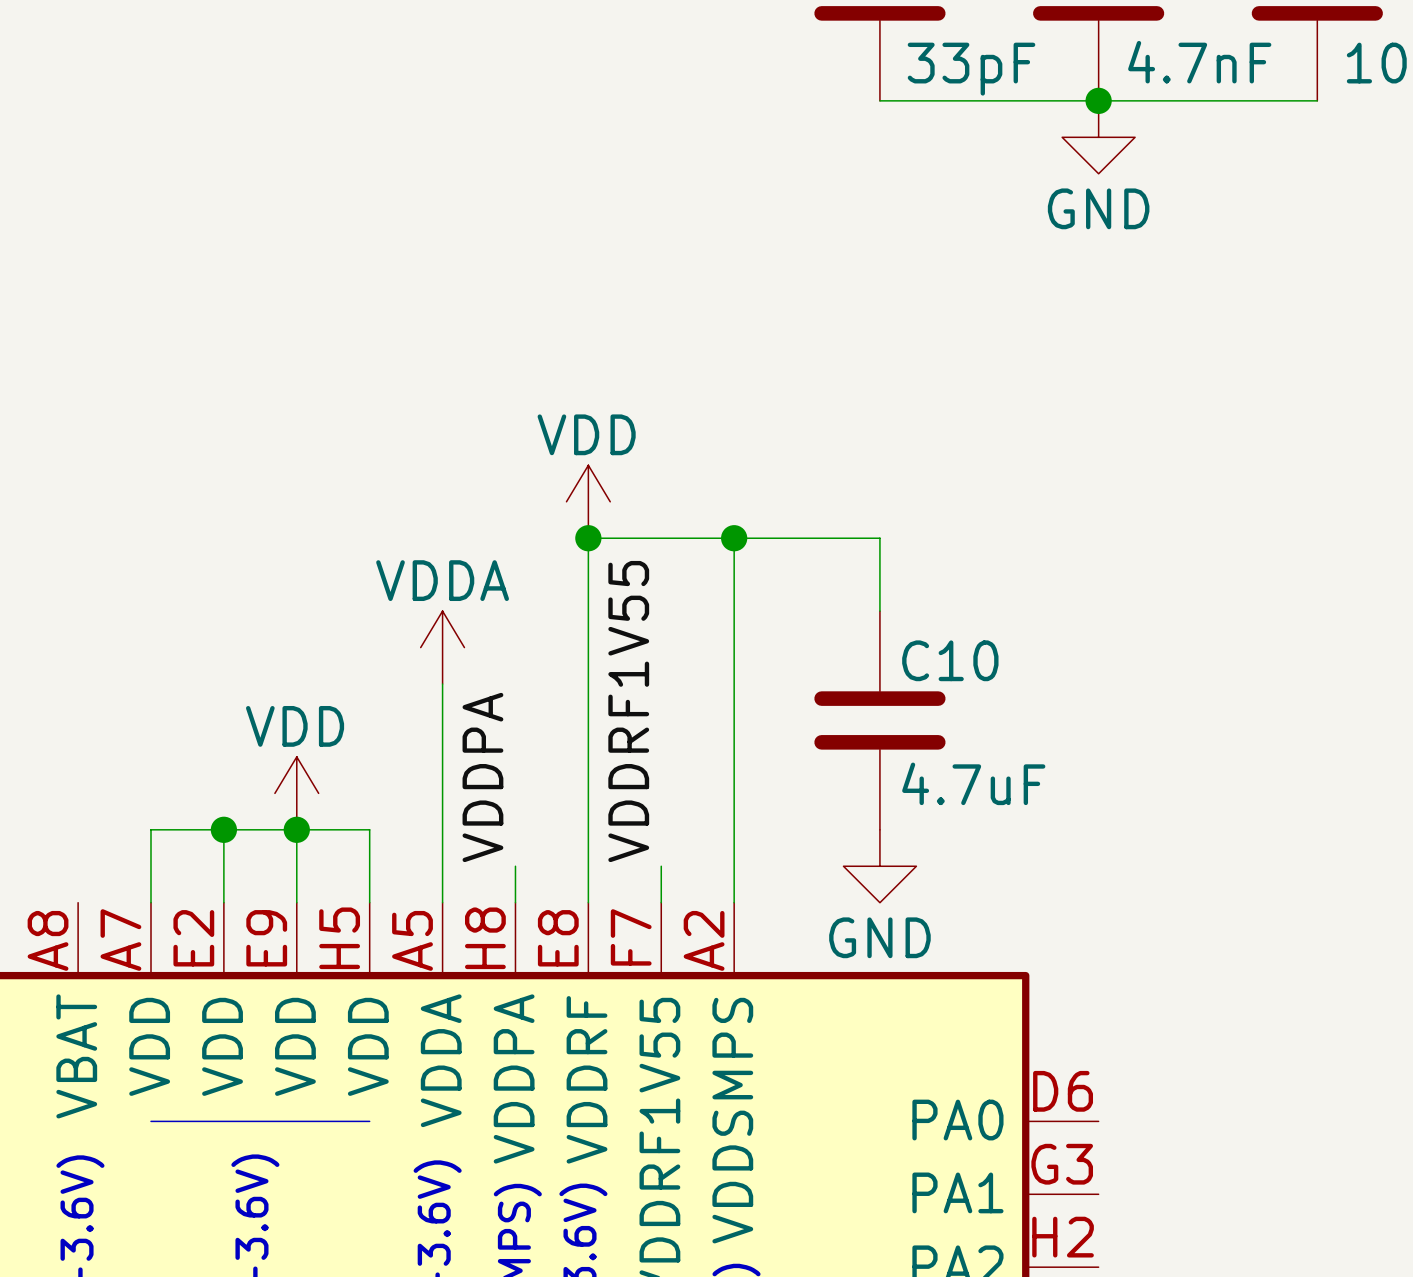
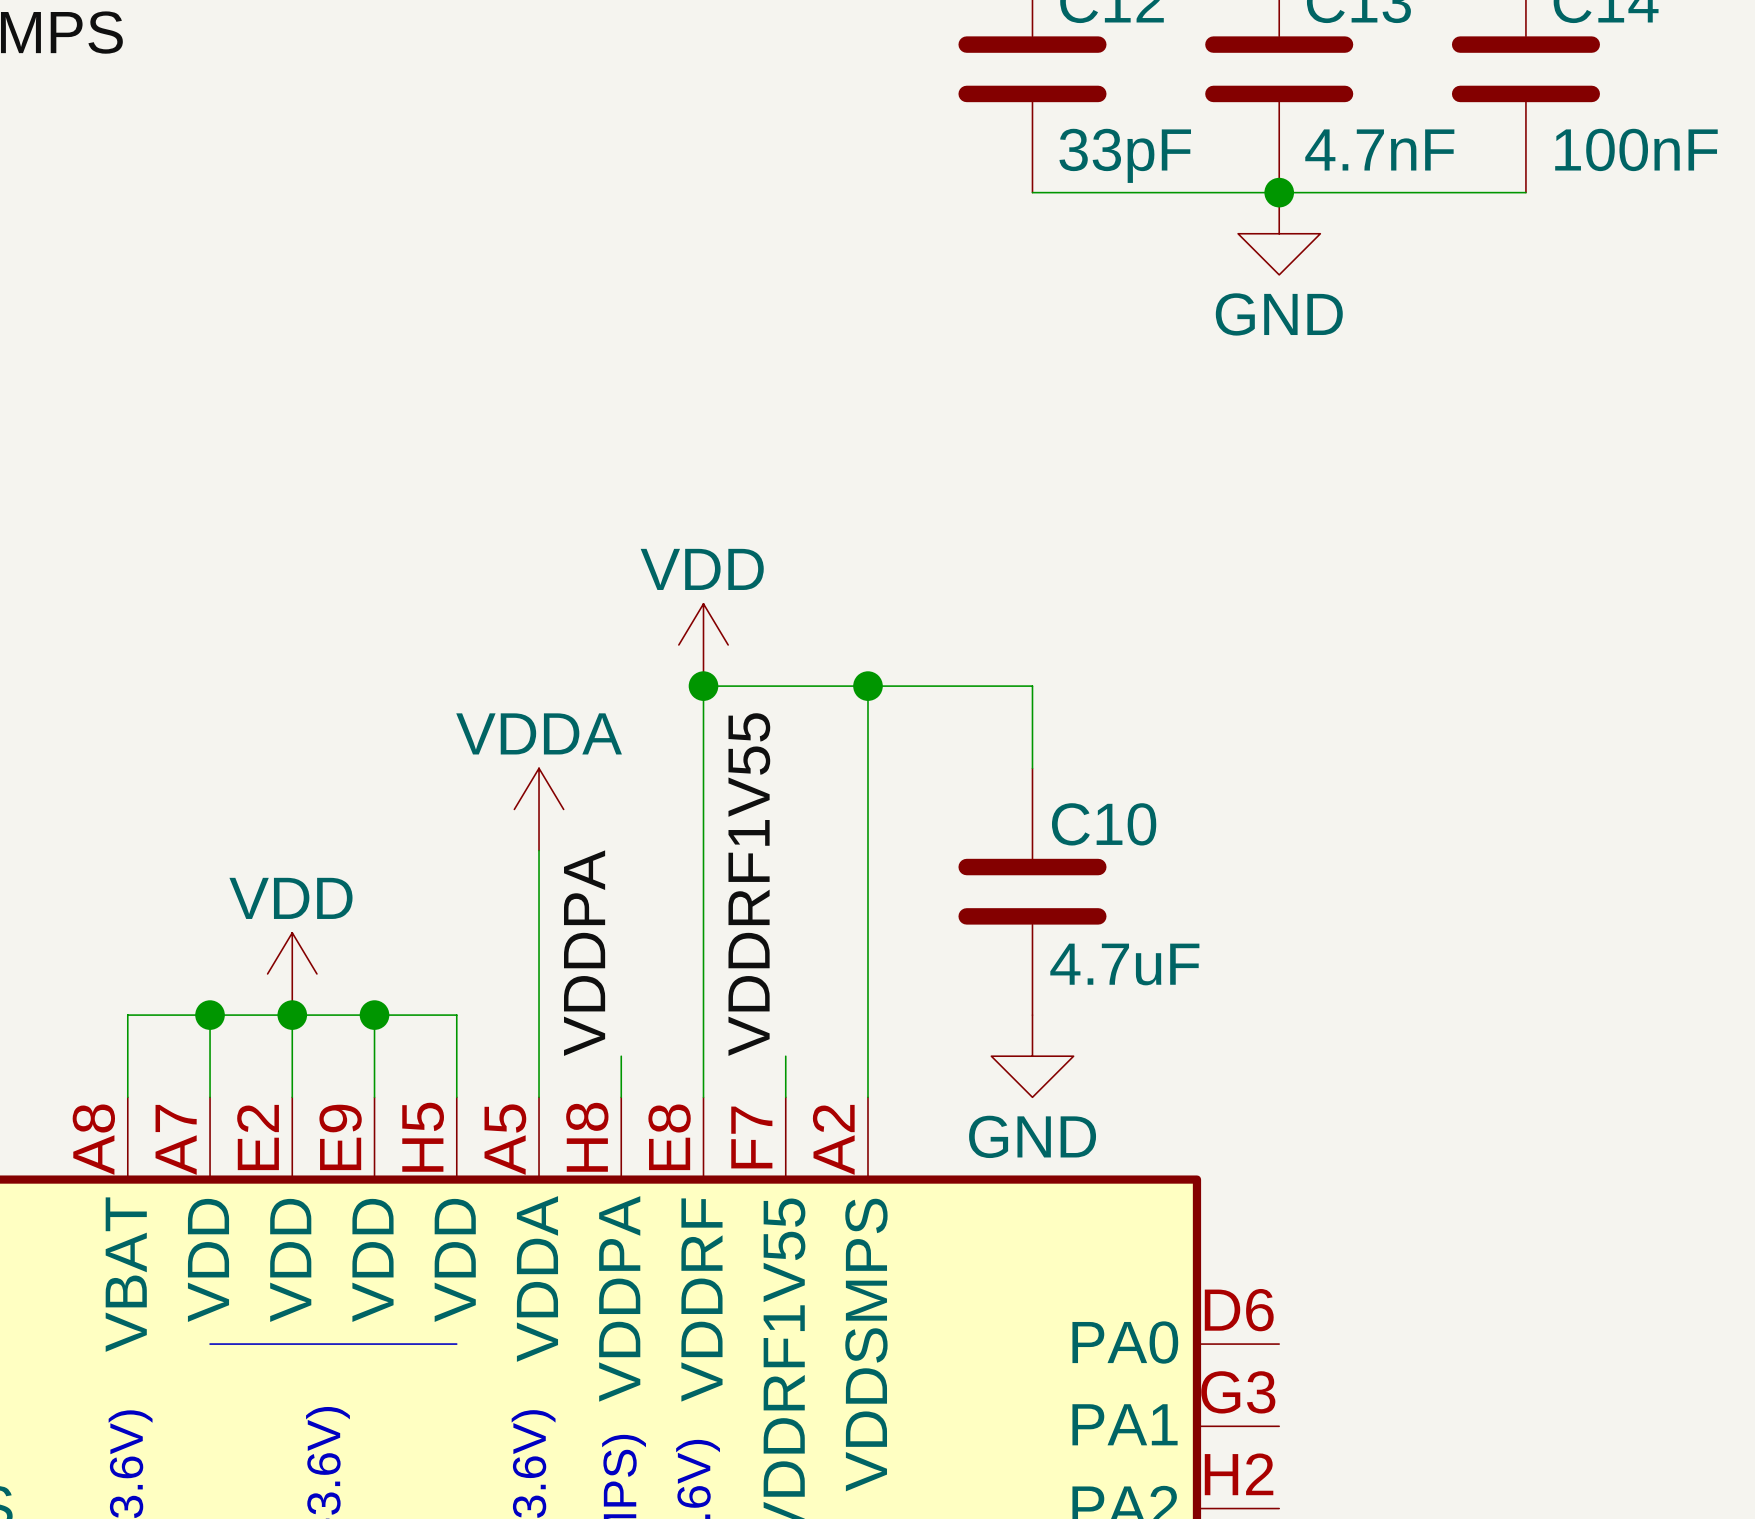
power symbol position: VDD (296, 793) -> VDD (292, 973)
wire: none -> (210, 1015) (127, 1015) (127, 1097)
junction: none -> (210, 1015)

